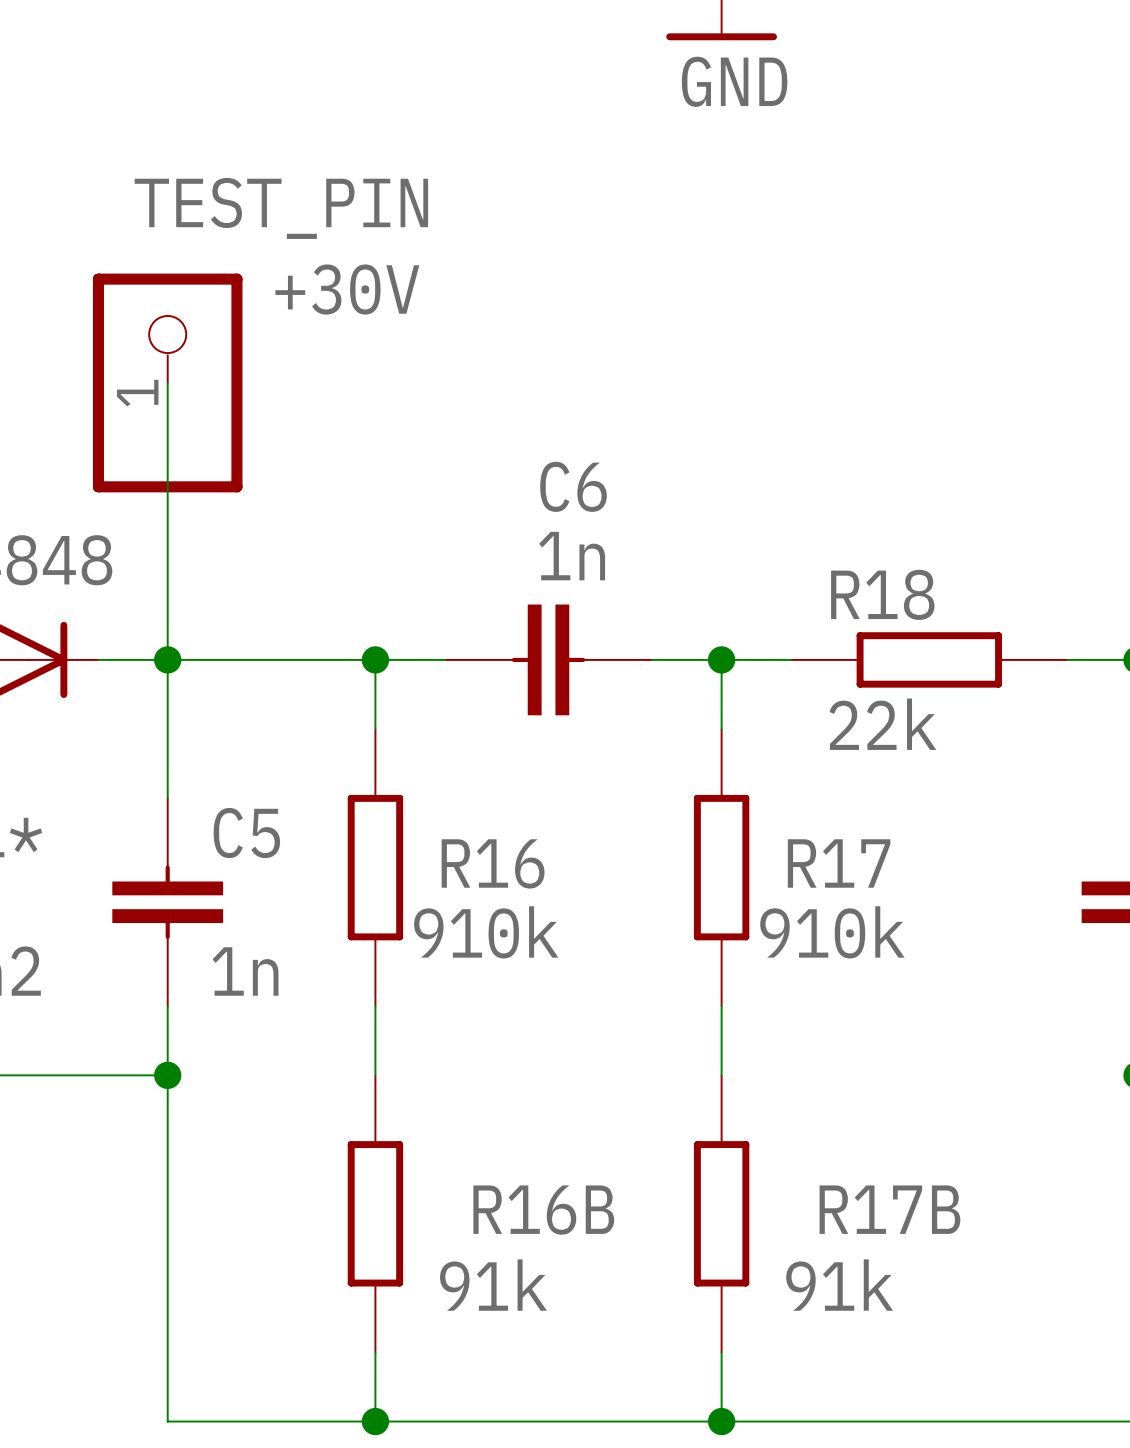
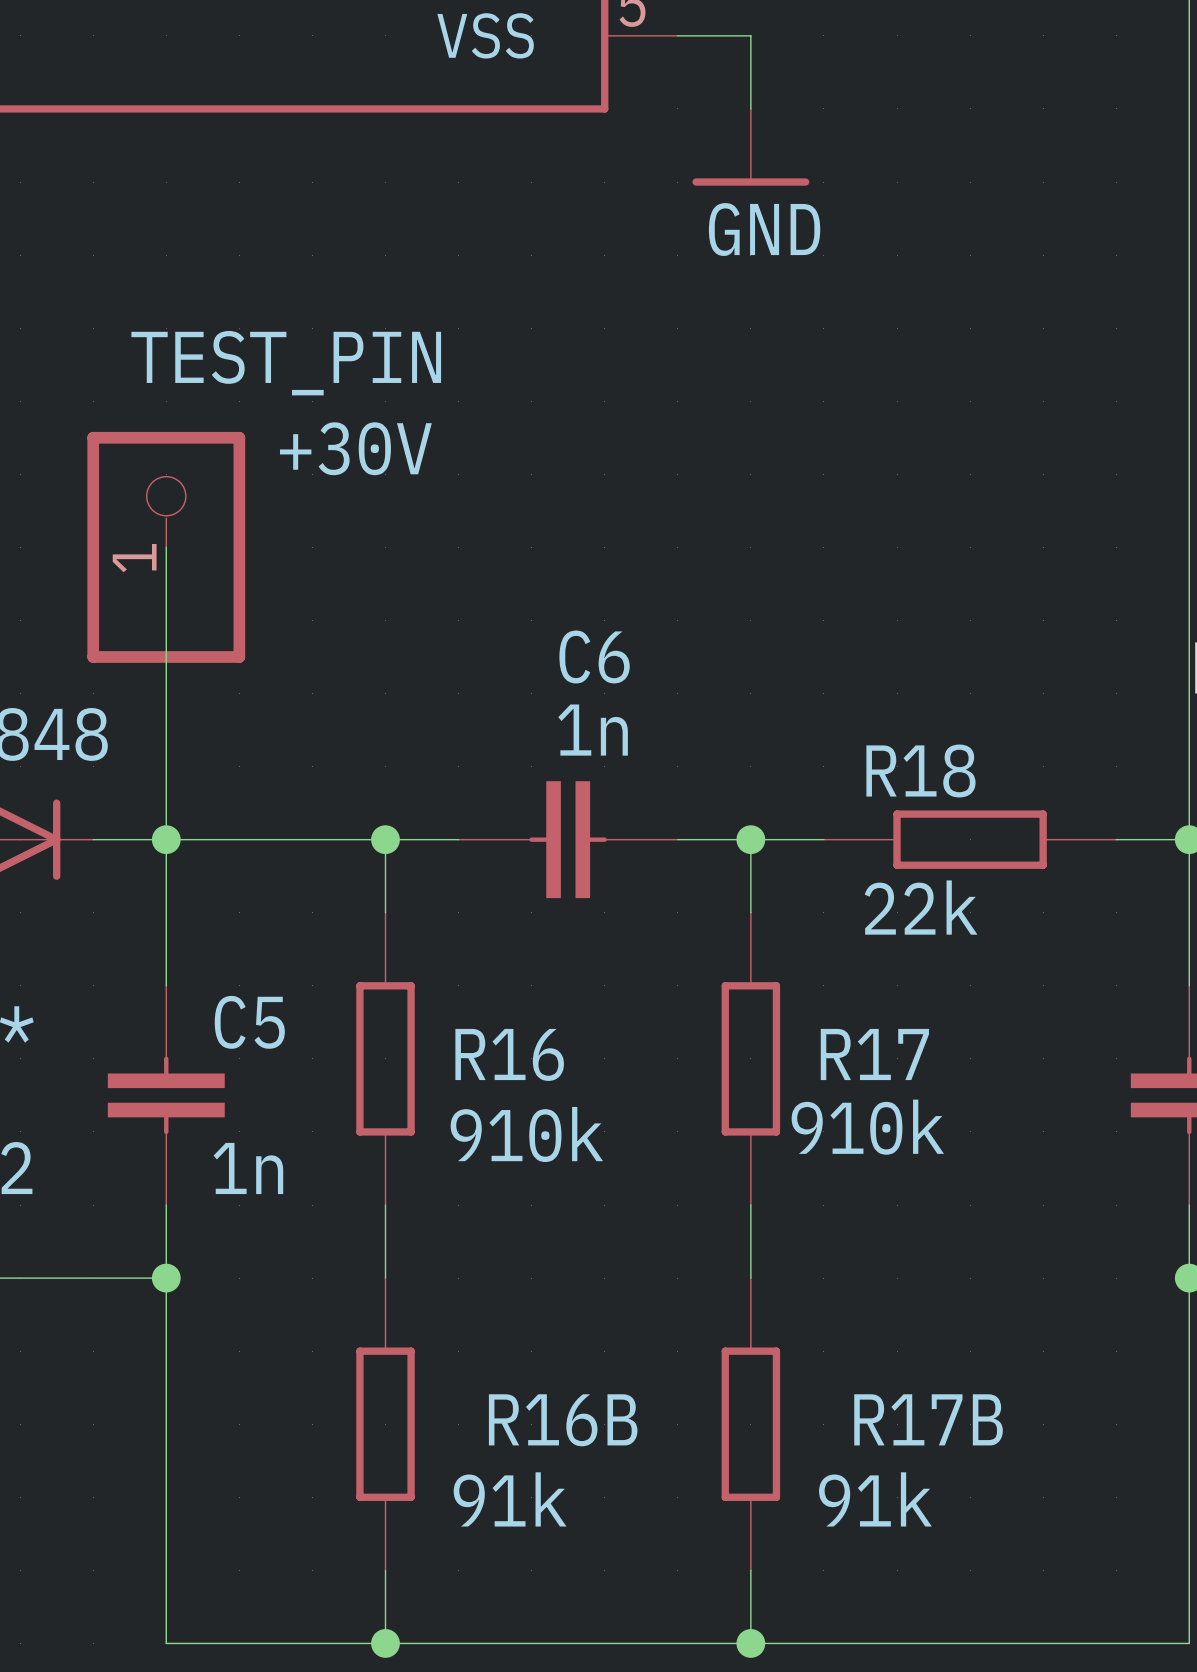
R16 value position: 910k (486, 932) -> 910k (526, 1134)

